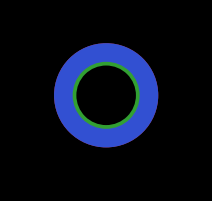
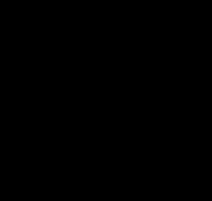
part: (106, 95) -> none

